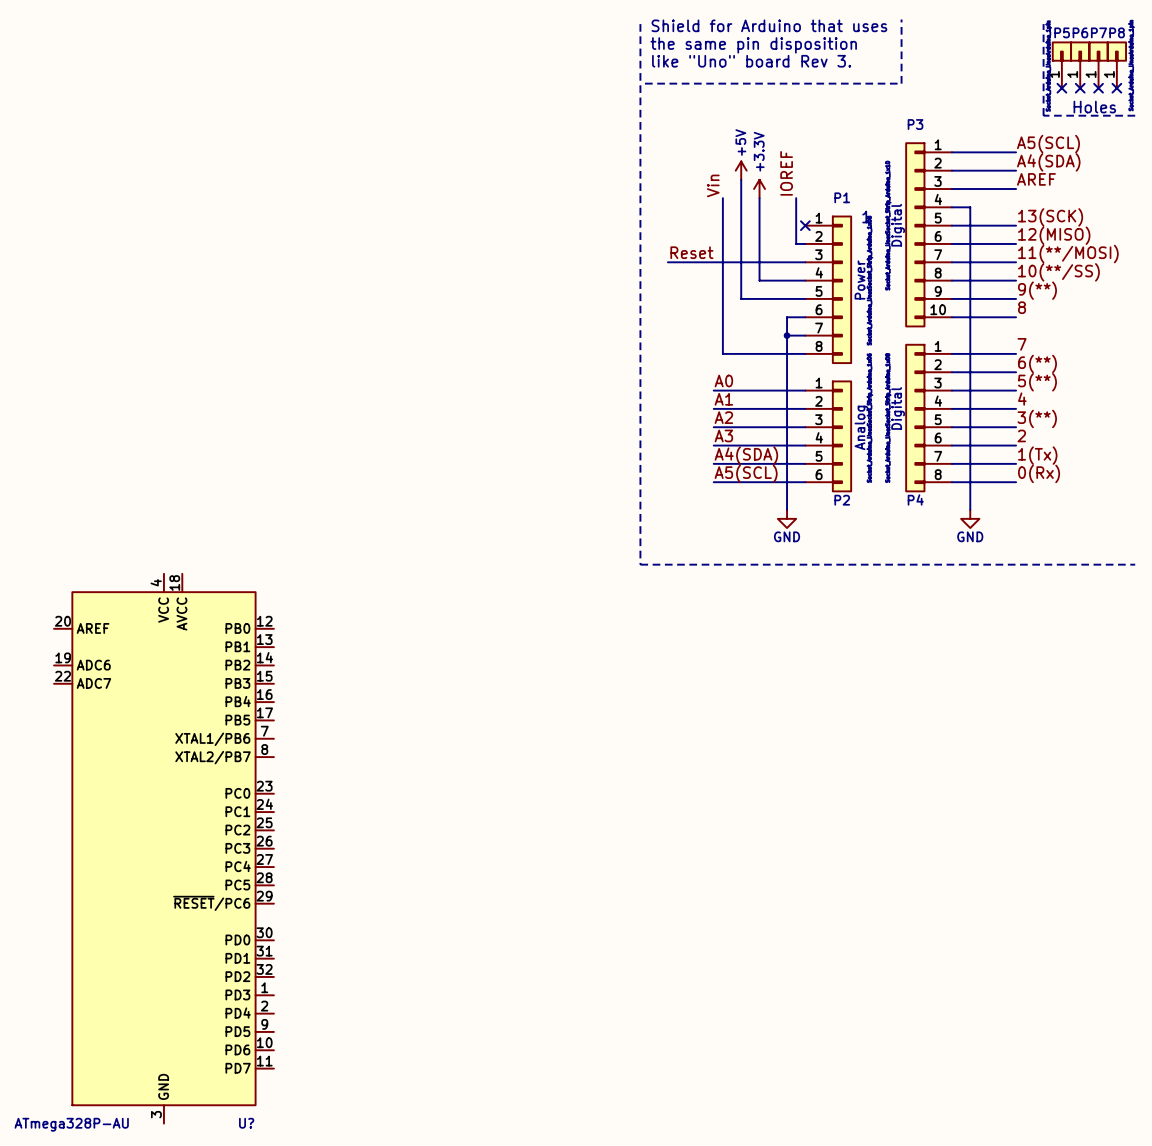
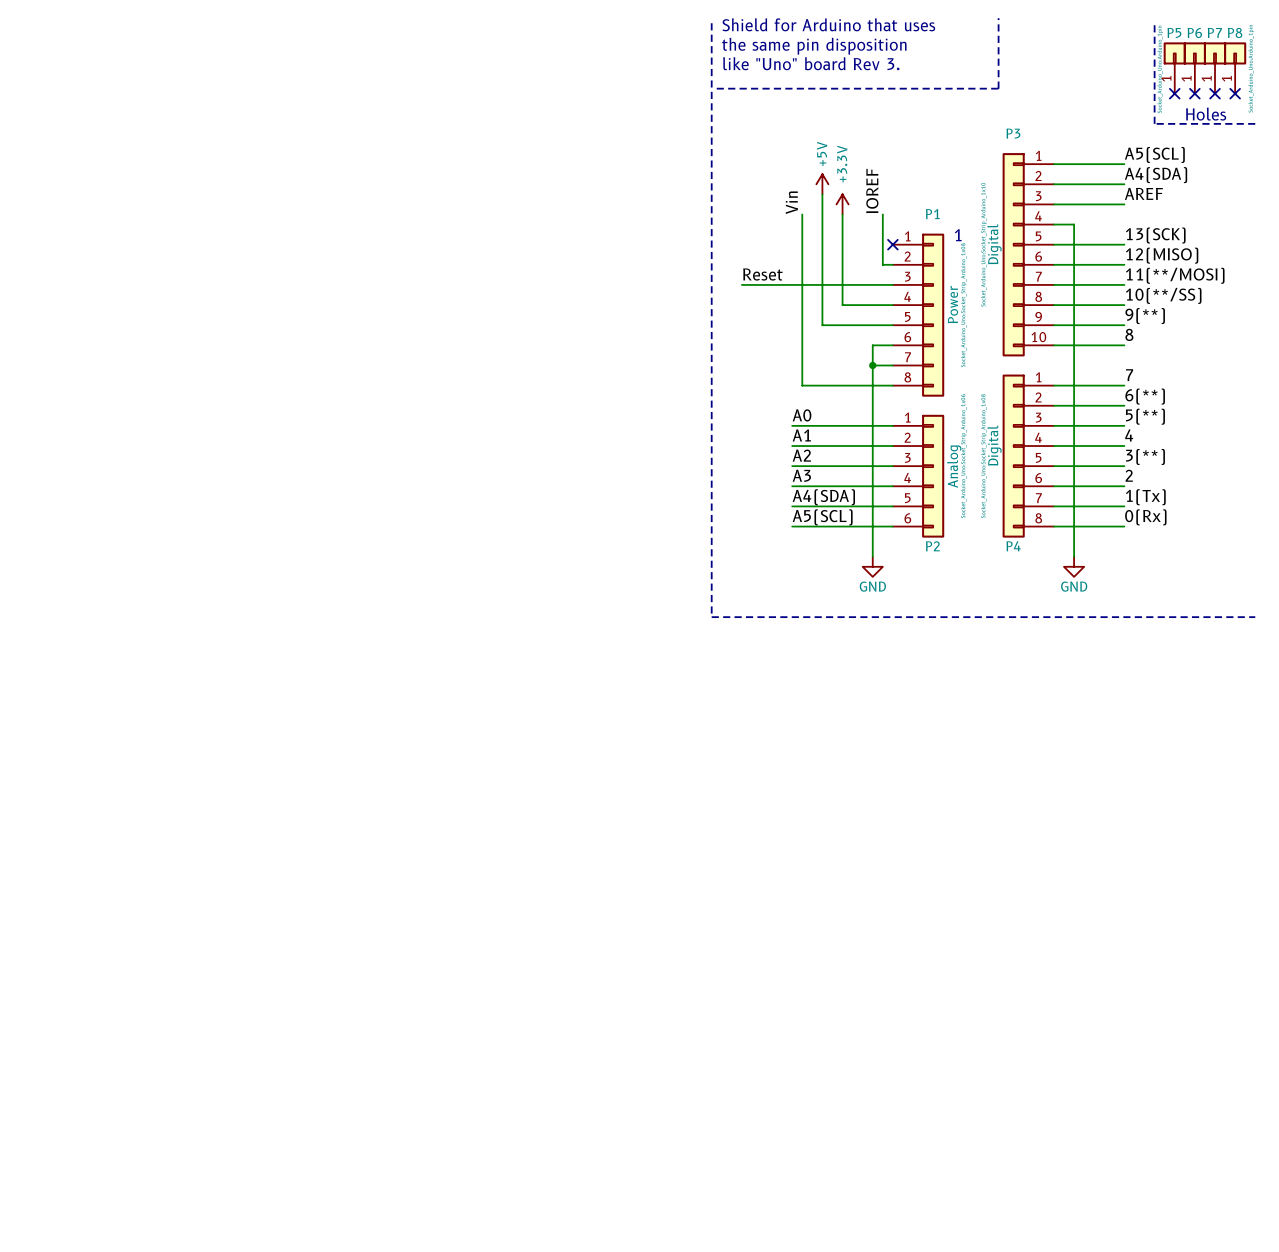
U?: ATmega328P-AU (163, 848) -> none

